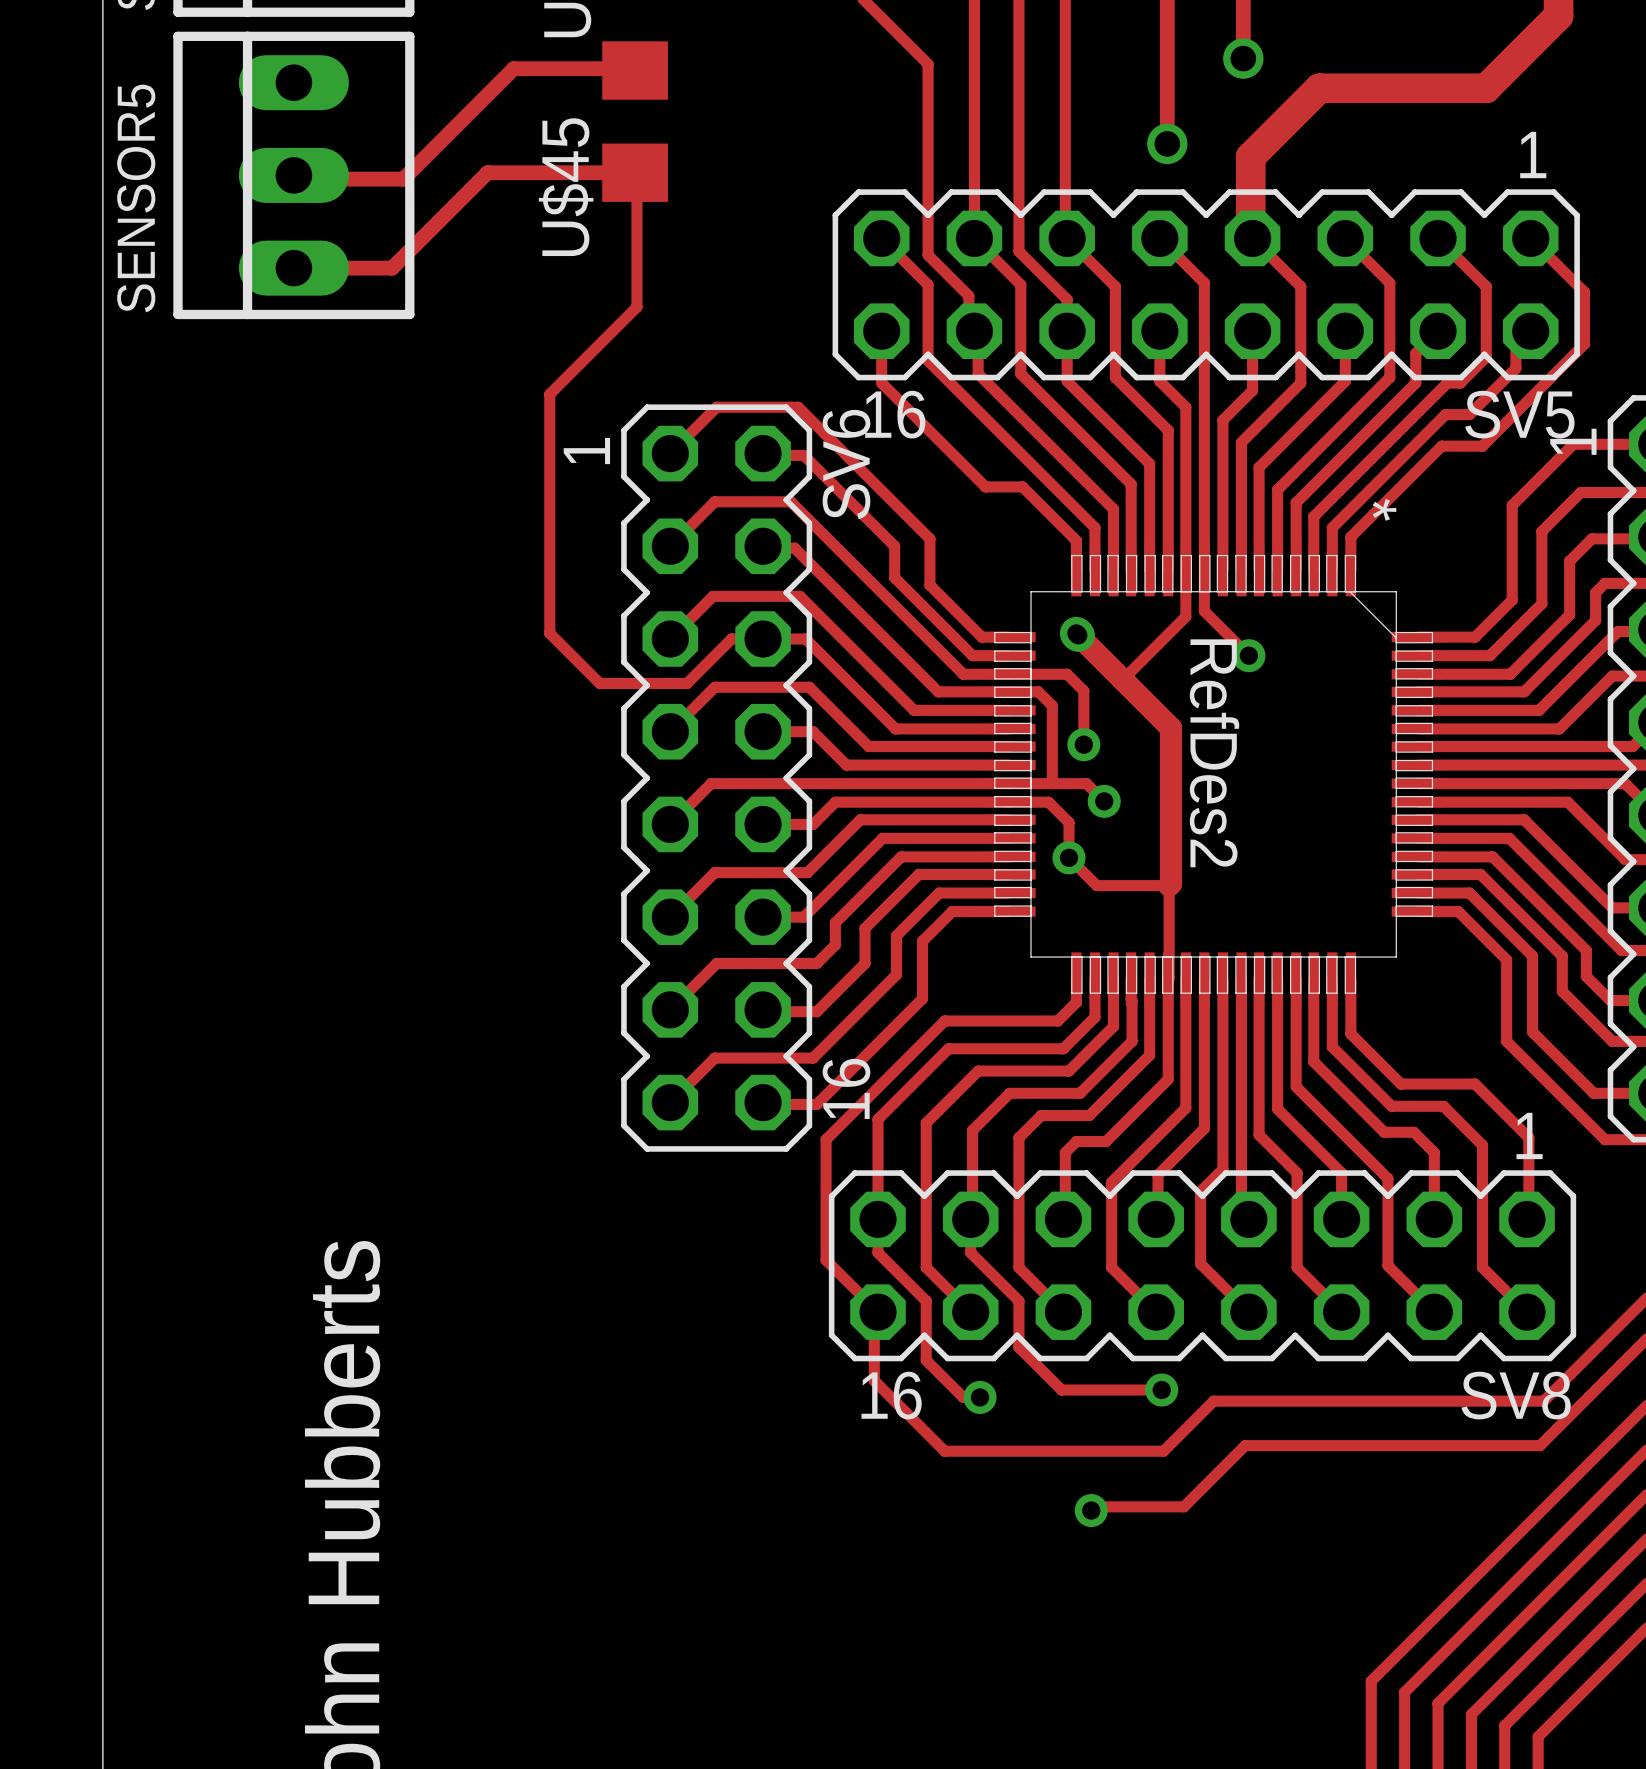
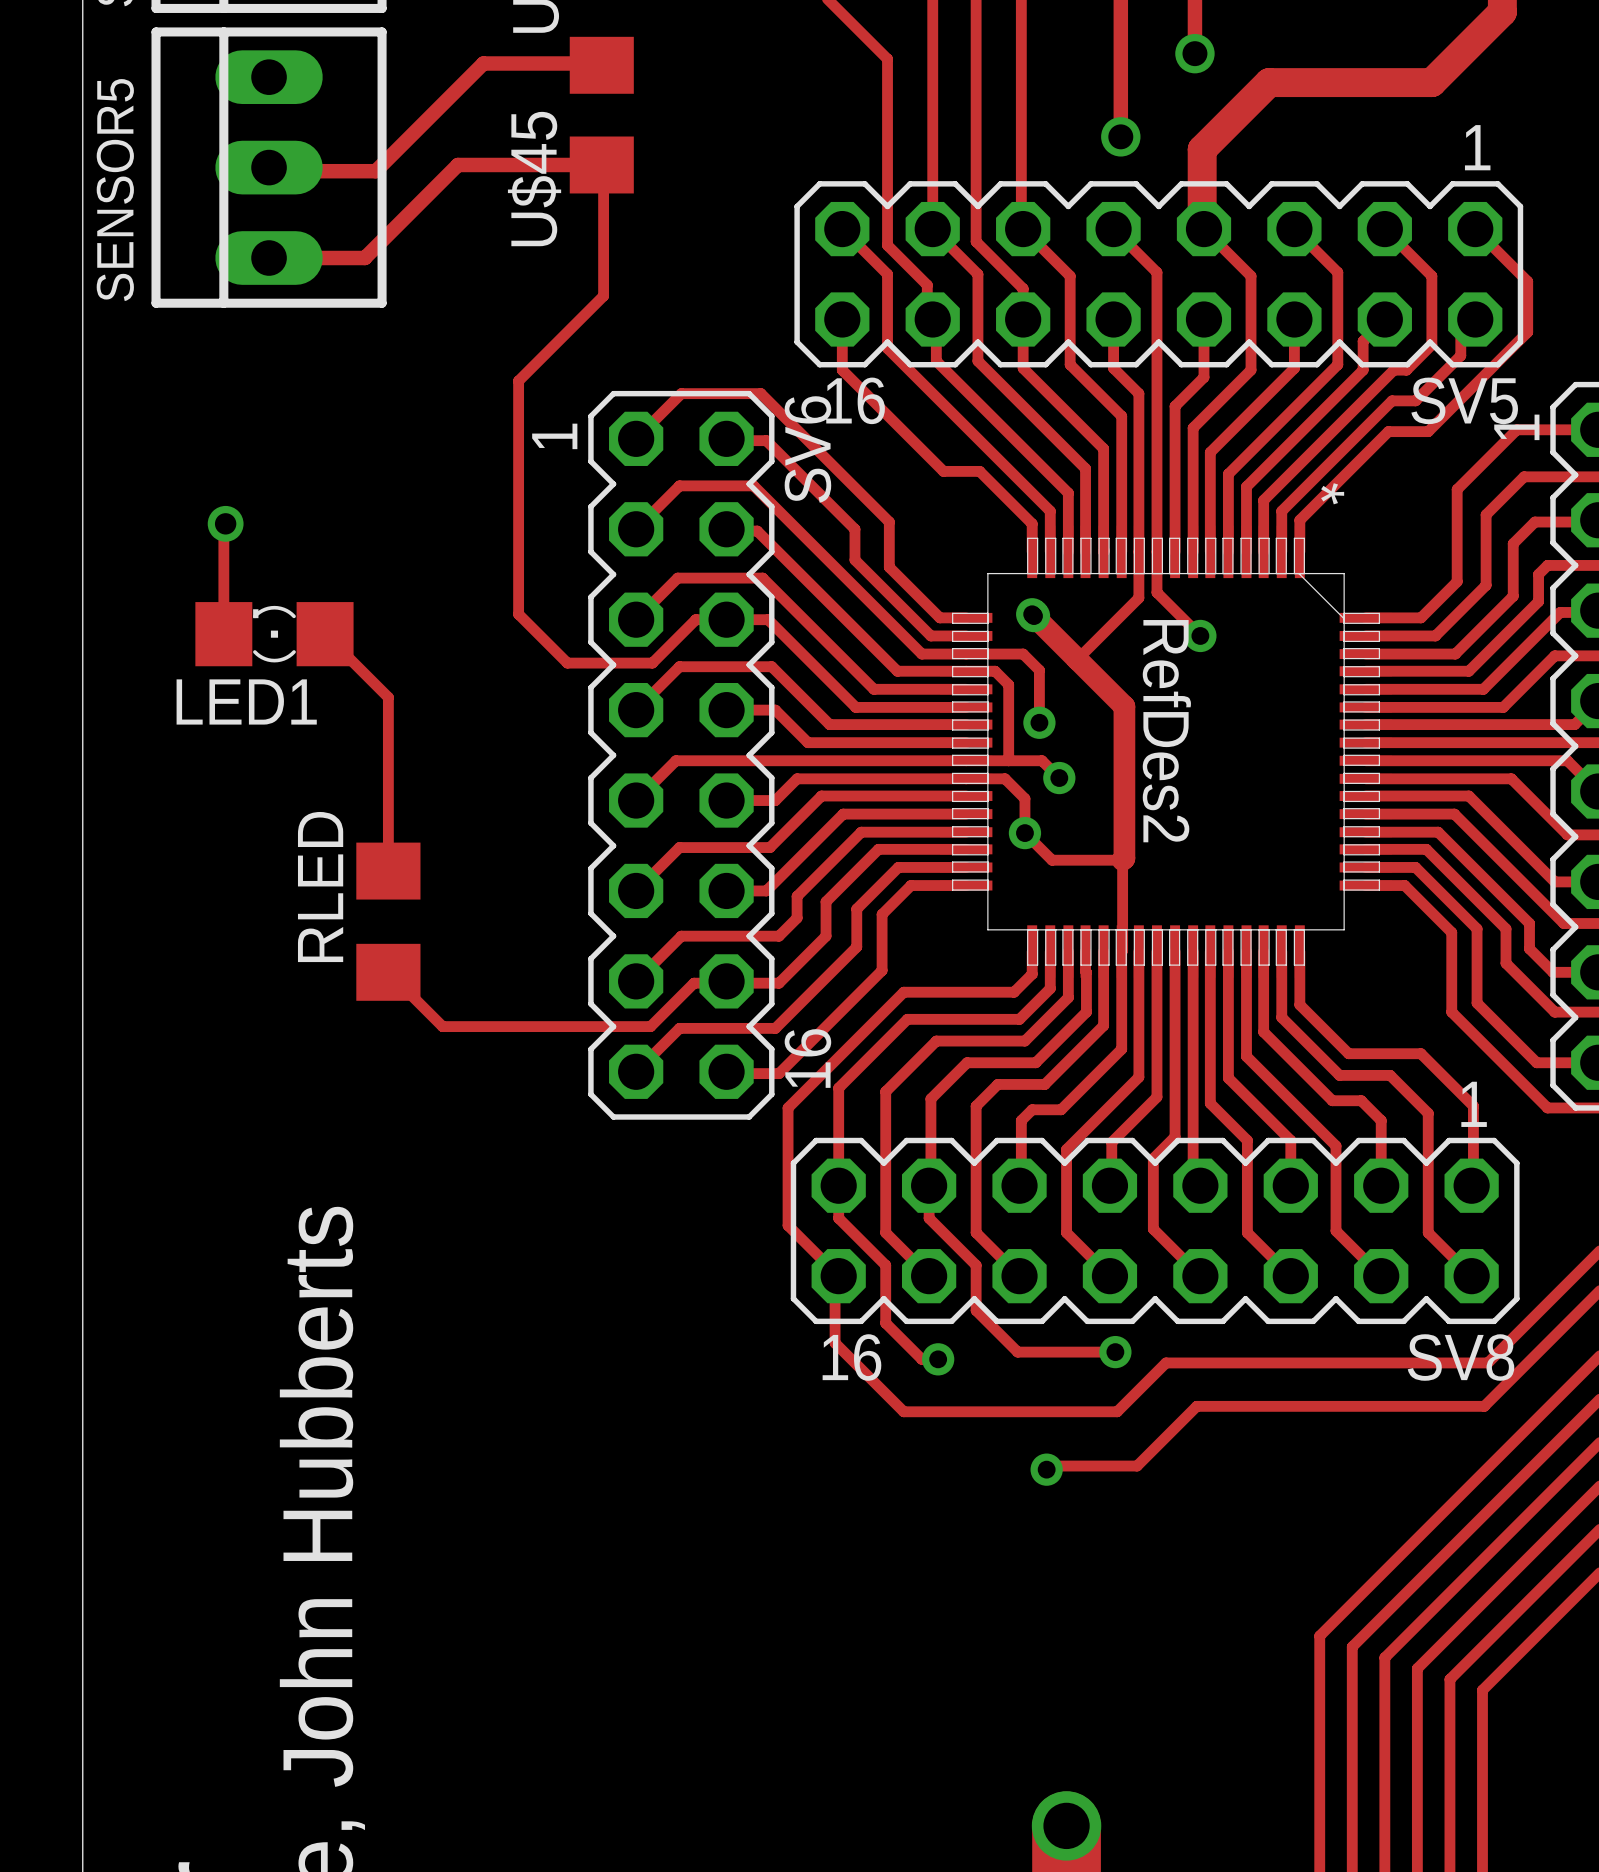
track: none -> (225, 523) (223, 525) (223, 634)
via: none -> (225, 523)
LED1: none -> (274, 634)
track: none -> (325, 634) (388, 697) (388, 871)
RLED: none -> (388, 921)
track: none -> (388, 972) (442, 1026) (650, 1026) (694, 983) (728, 983)

